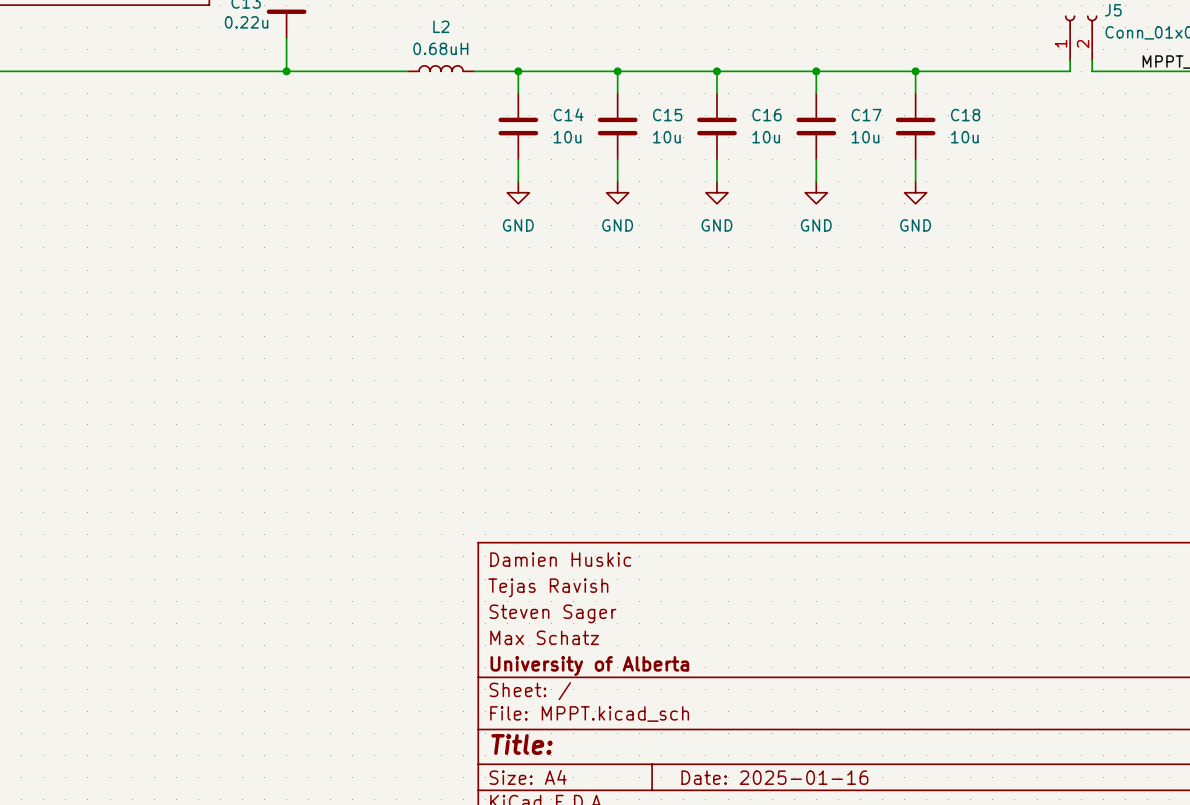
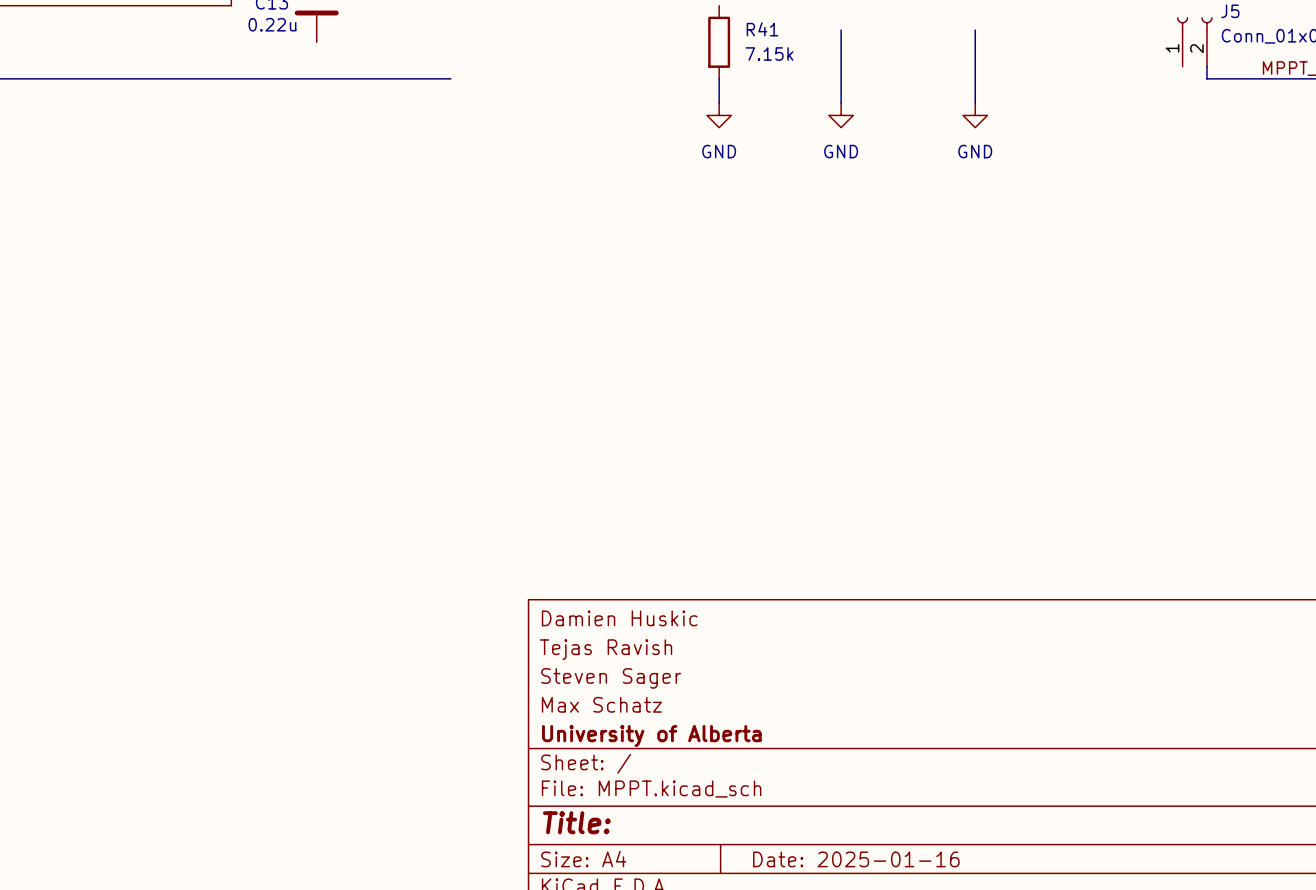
wire: none -> (841, 30) (841, 103)
wire: none -> (975, 30) (975, 103)
wire: (286, 38) (286, 71) -> none
R41: none -> 7.15k (719, 42)
wire: (1070, 60) (1070, 71) (474, 71) -> none
L2: 0.68uH (441, 68) -> none
junction: (286, 71) -> none
wire: (518, 71) (518, 93) -> none
junction: (518, 71) -> none
wire: (617, 71) (617, 93) -> (719, 78) (719, 103)
junction: (617, 71) -> none
wire: (716, 71) (716, 93) -> none
junction: (716, 71) -> none
wire: (816, 71) (816, 93) -> none
junction: (816, 71) -> none
wire: (915, 71) (915, 93) -> none
junction: (915, 71) -> none
power symbol: none -> GND (719, 115)
power symbol: none -> GND (841, 115)
power symbol: none -> GND (975, 115)
C14: 10u (518, 126) -> none
C15: 10u (617, 126) -> none
C16: 10u (716, 126) -> none
C17: 10u (816, 126) -> none
C18: 10u (915, 126) -> none
wire: (518, 159) (518, 181) -> none
wire: (617, 159) (617, 181) -> none
wire: (716, 159) (716, 181) -> none
wire: (816, 159) (816, 181) -> none
wire: (915, 159) (915, 181) -> none
power symbol: GND (518, 192) -> none
power symbol: GND (617, 192) -> none
power symbol: GND (716, 192) -> none
power symbol: GND (816, 192) -> none
power symbol: GND (915, 192) -> none

